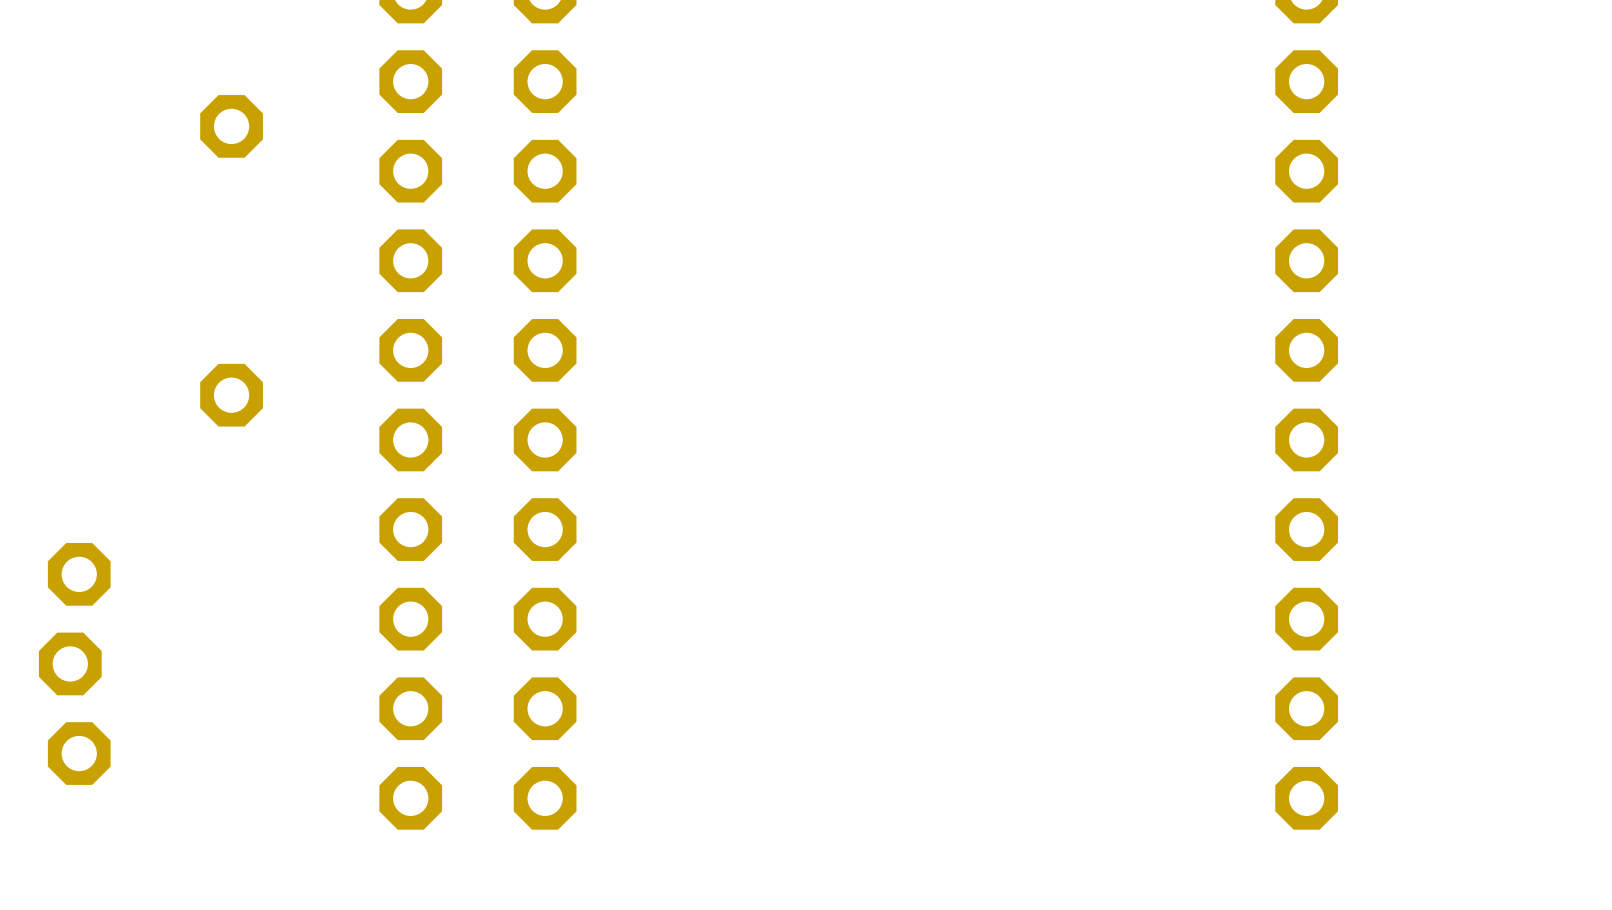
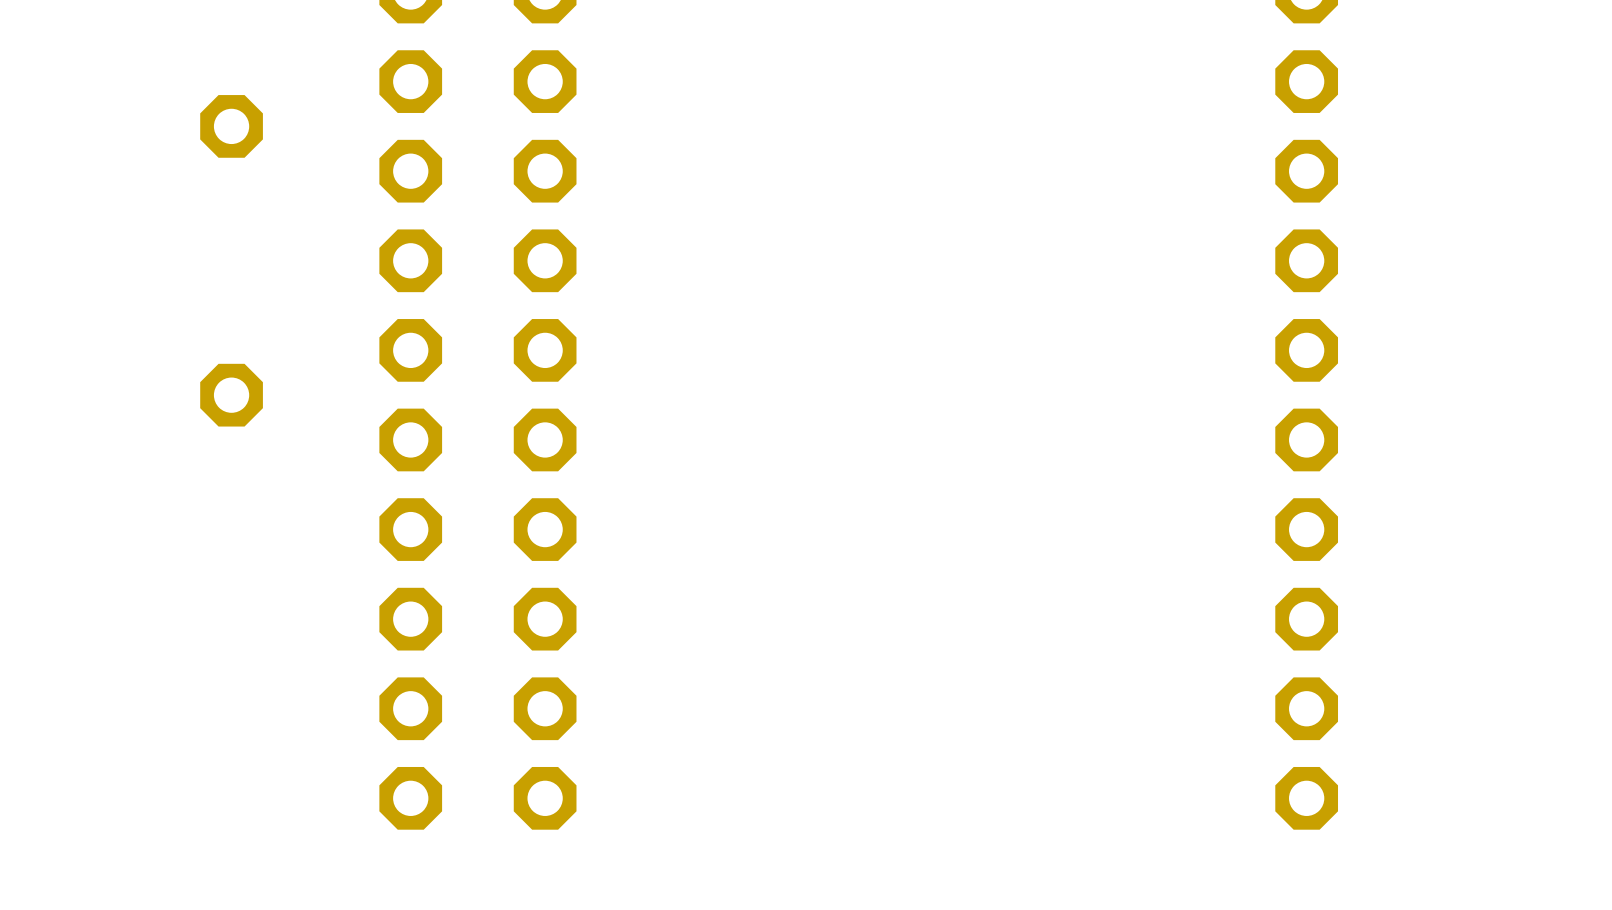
part: (74, 663) -> none

